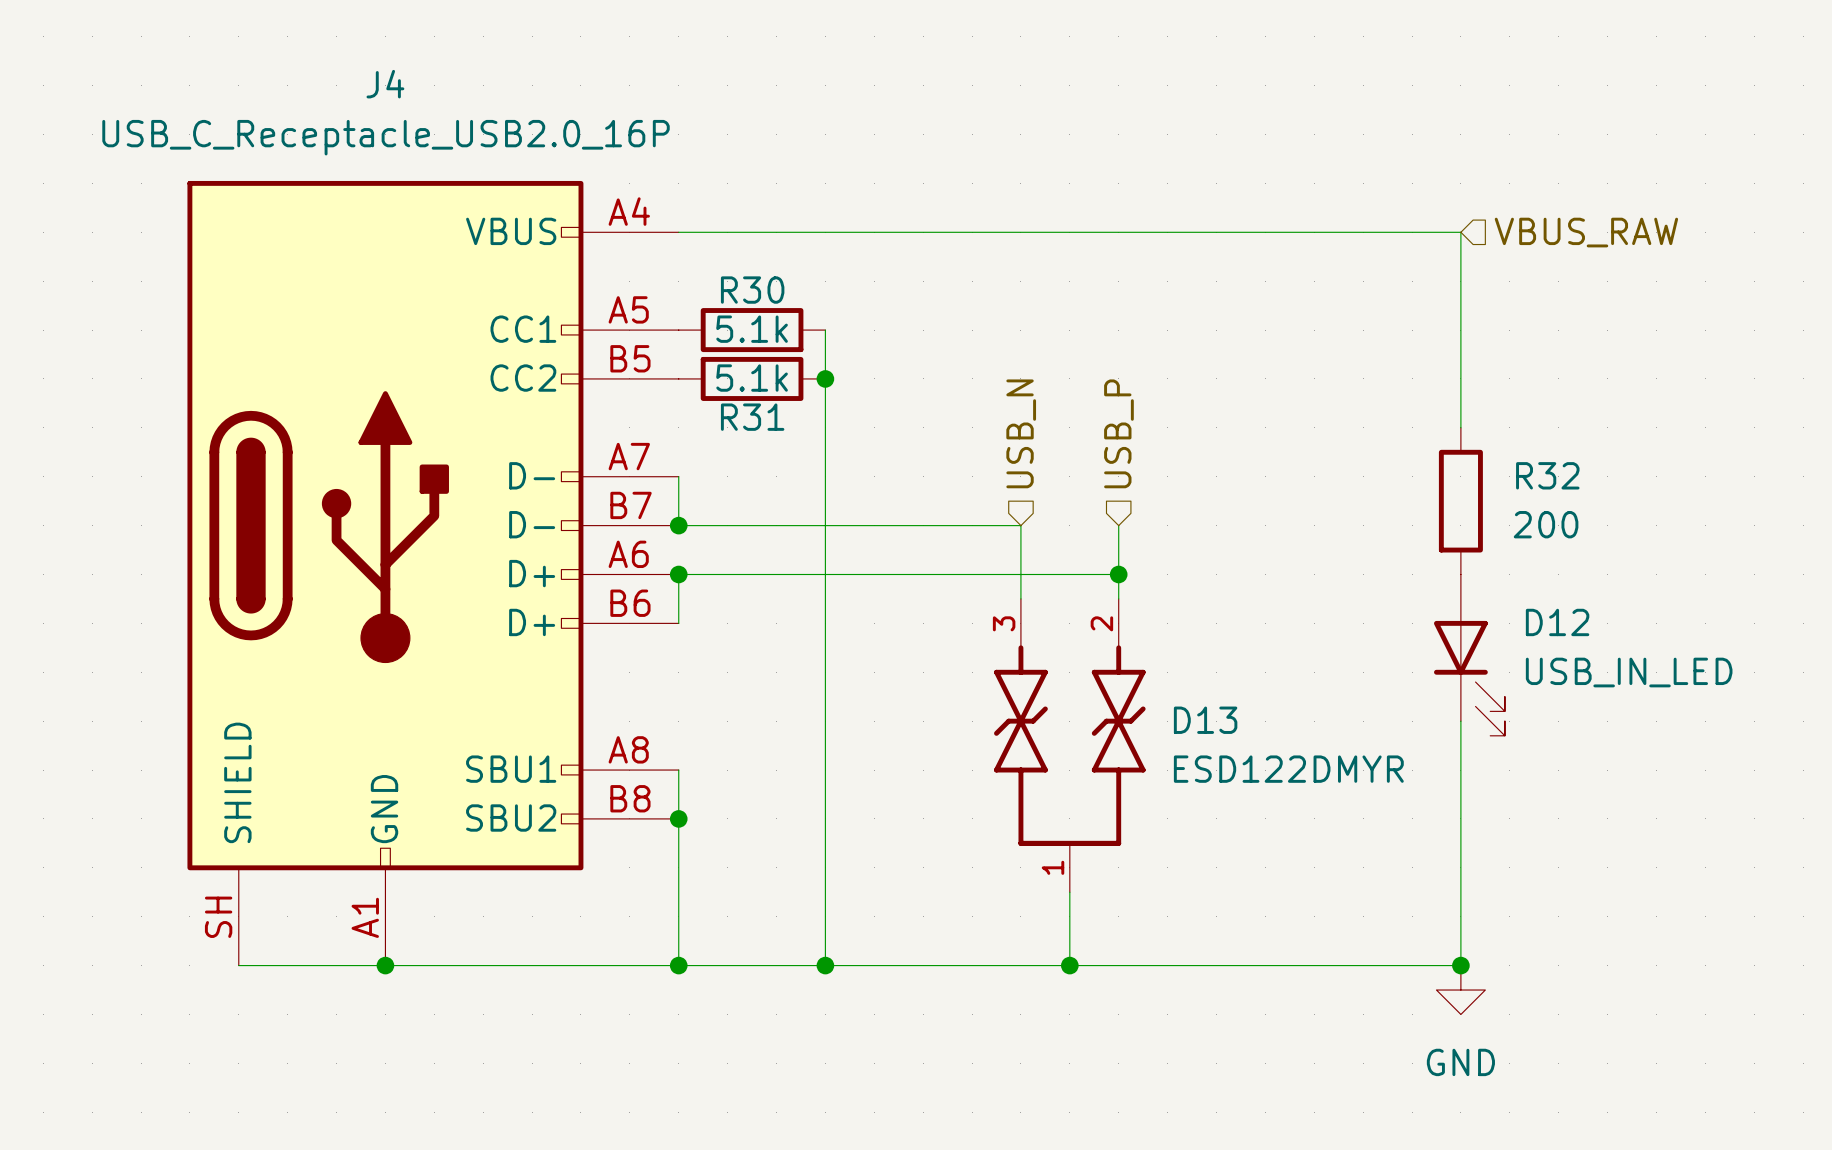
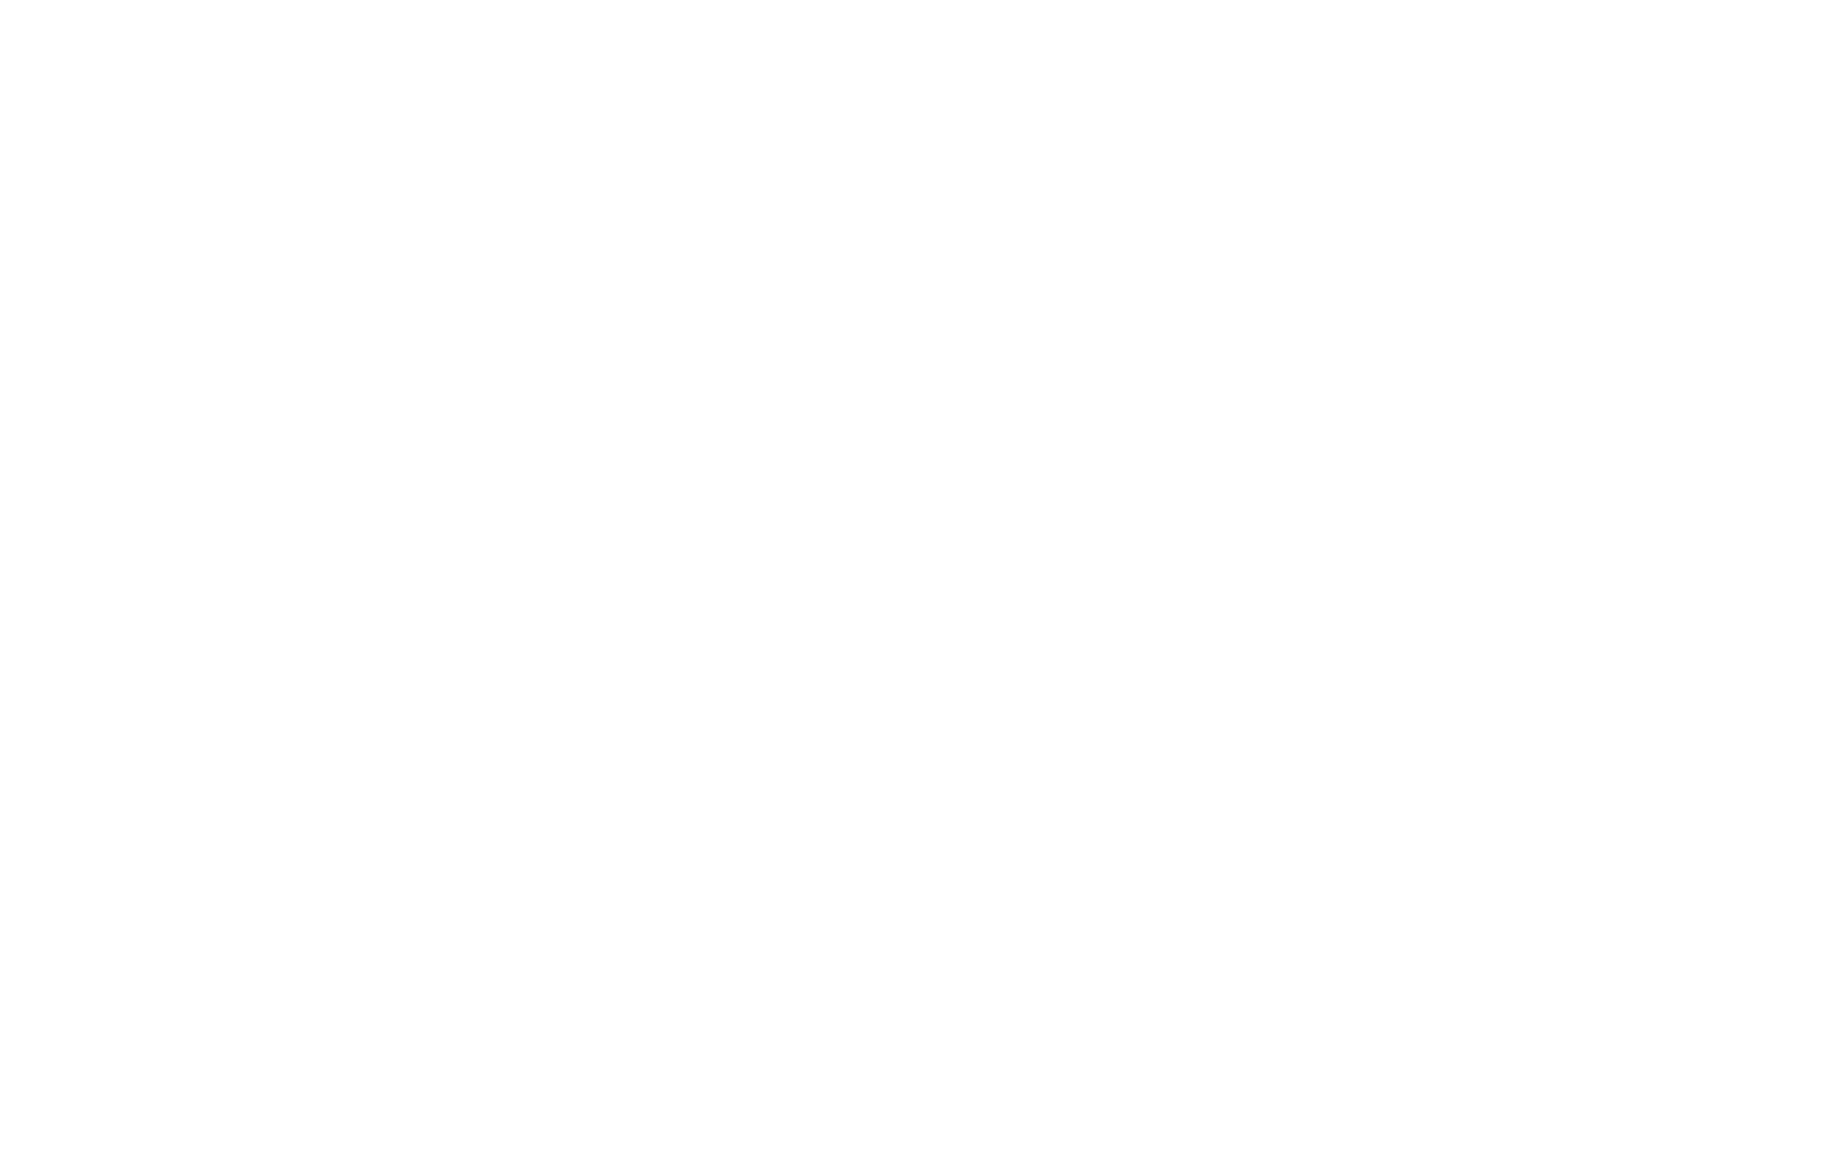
wire: (678, 232) (1460, 232) (1460, 427) -> none
hierarchical label: VBUS_RAW (1586, 232) -> none
R30: 5.1k (752, 330) -> none
wire: (825, 330) (825, 965) -> none
R31: 5.1k (752, 378) -> none
junction: (825, 378) -> none
hierarchical label: USB_N (1021, 433) -> none
hierarchical label: USB_P (1118, 433) -> none
wire: (678, 476) (678, 525) (1020, 525) (1020, 598) -> none
R32: 200 (1460, 501) -> none
junction: (678, 525) -> none
wire: (1118, 525) (1118, 598) -> none
J4: USB_C_Receptacle_USB2.0_16P (433, 573) -> none
junction: (678, 574) -> none
wire: (1118, 574) (678, 574) (678, 623) -> none
junction: (1118, 574) -> none
D12: USB_IN_LED (1469, 655) -> none
wire: (1460, 721) (1460, 965) (238, 965) -> none
D13: ESD122DMYR (1069, 745) -> none
wire: (678, 770) (678, 965) -> none
junction: (678, 818) -> none
wire: (1069, 892) (1069, 965) -> none
junction: (385, 965) -> none
junction: (678, 965) -> none
junction: (825, 965) -> none
junction: (1069, 965) -> none
junction: (1460, 965) -> none
power symbol: GND (1460, 990) -> none

